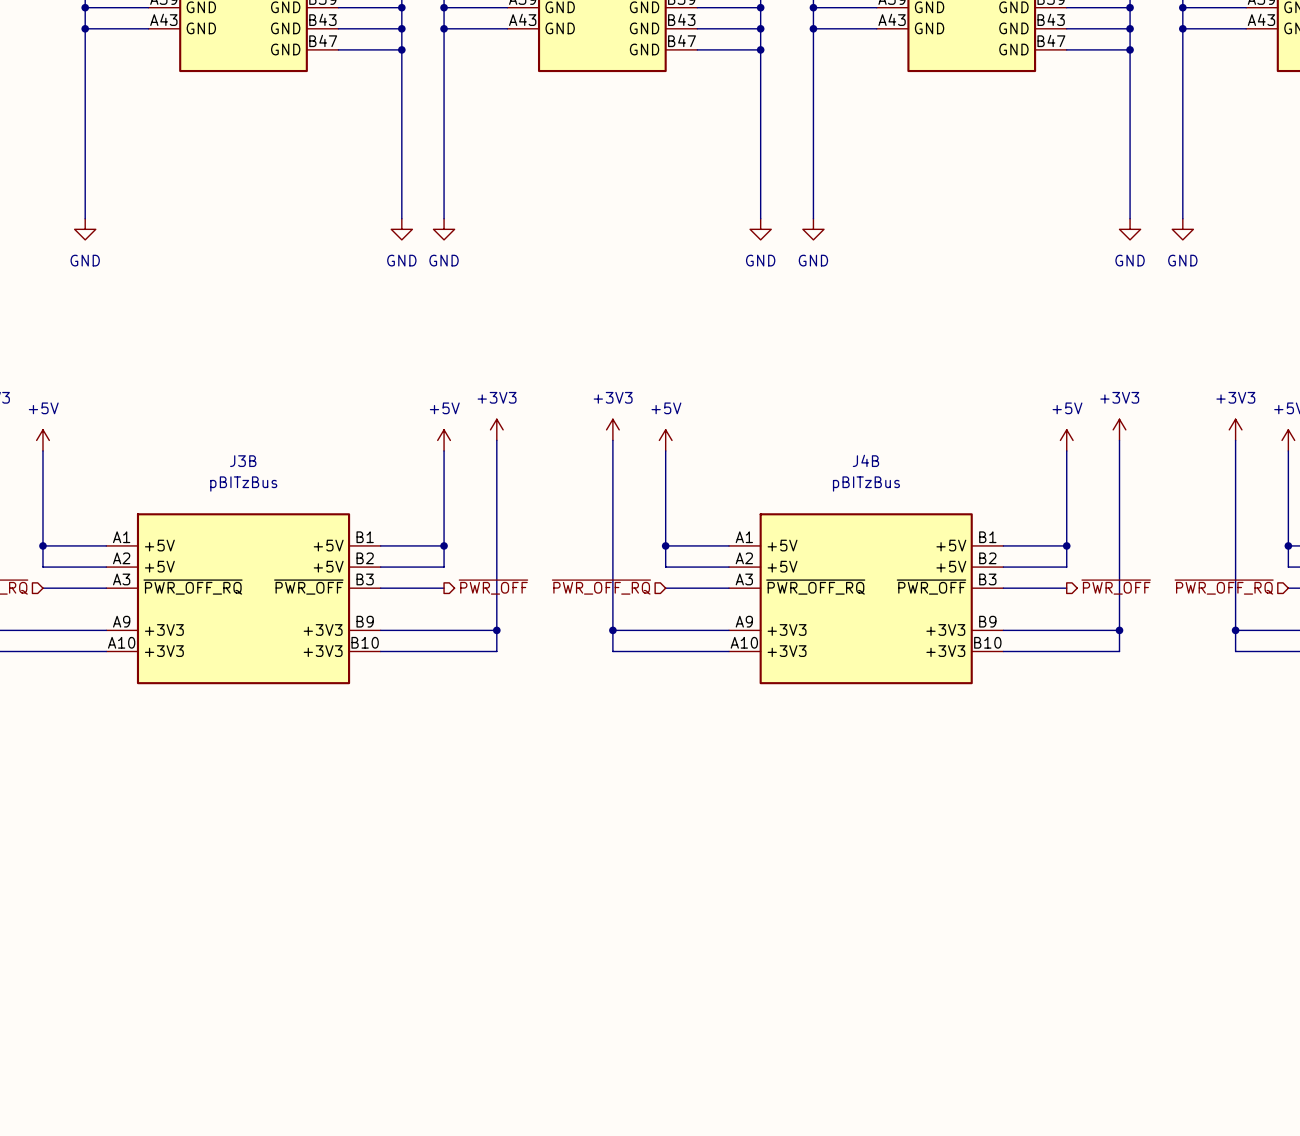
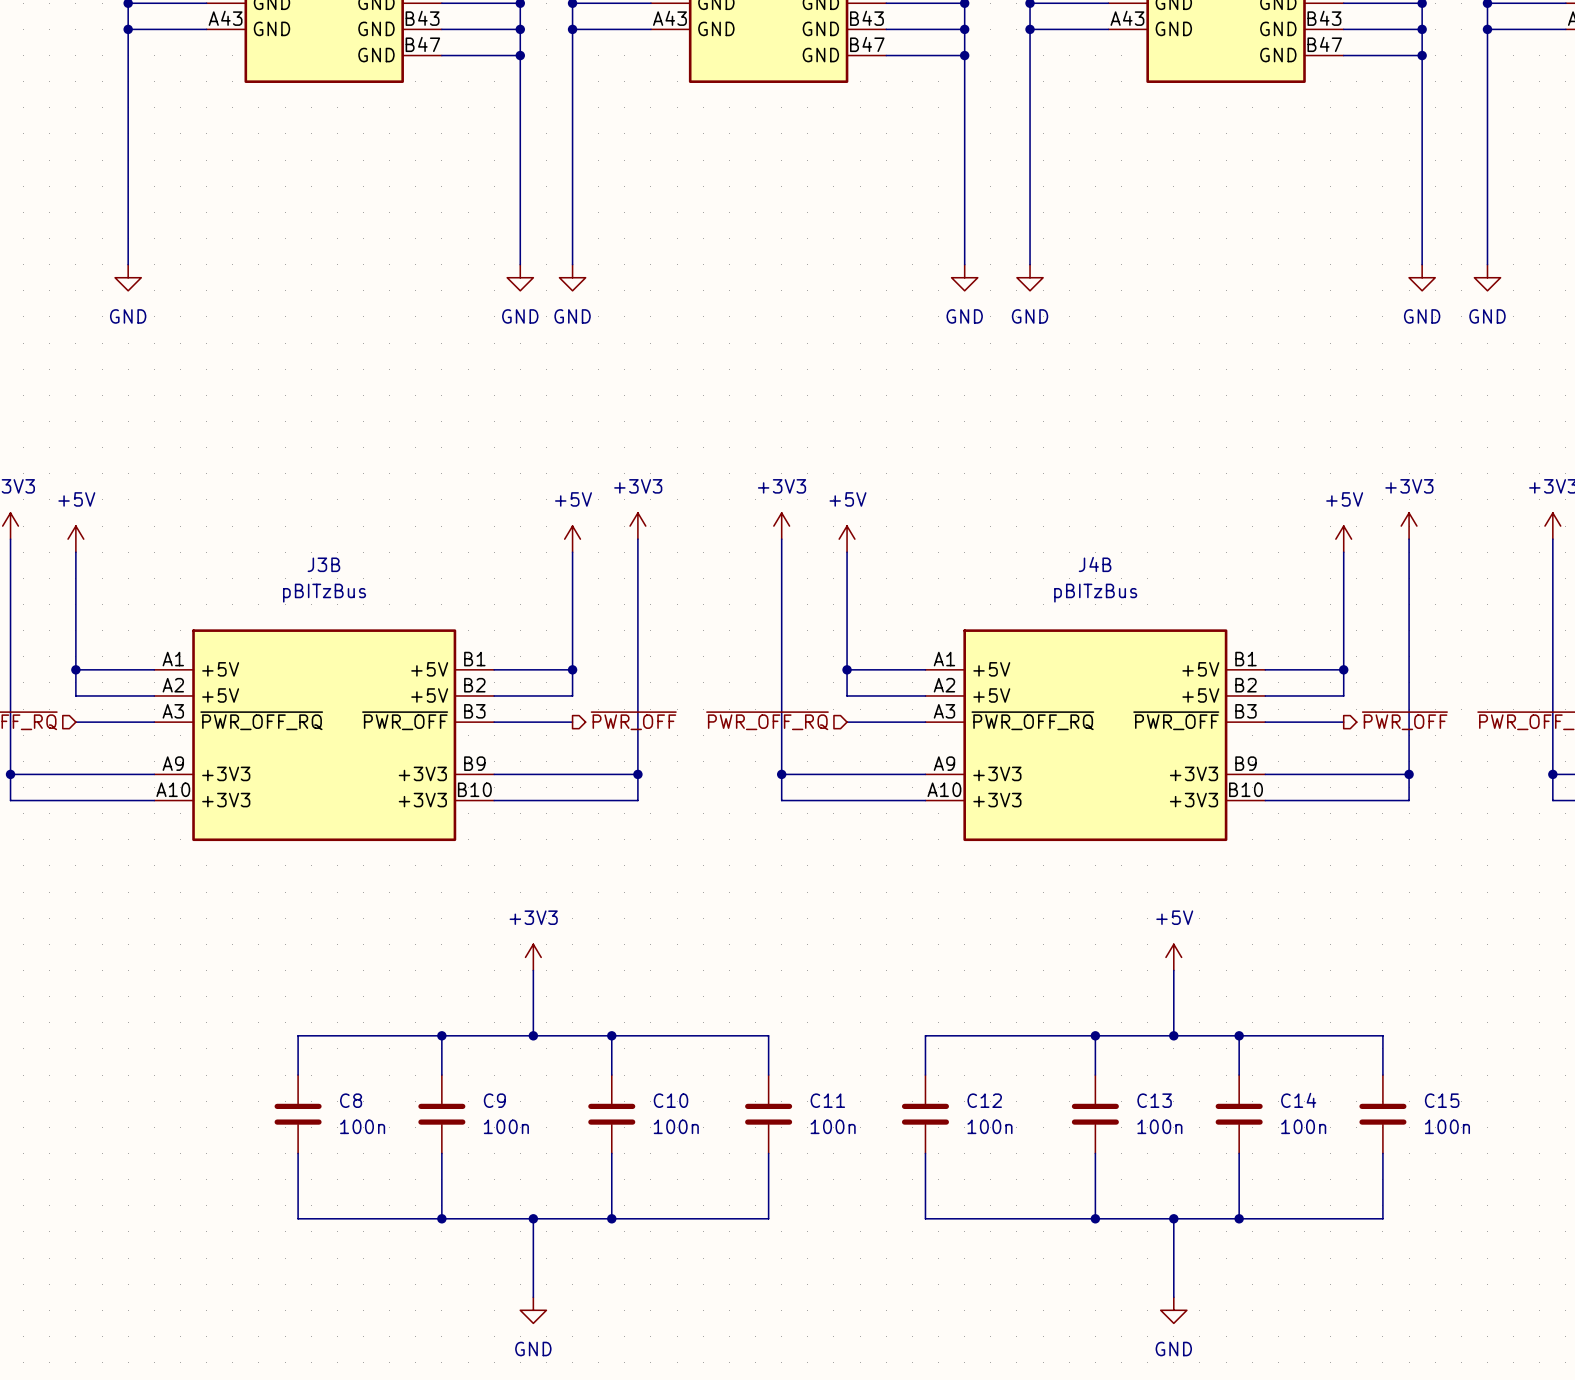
power symbol: none -> +3V3 (533, 957)
power symbol: none -> +5V (1173, 957)
wire: none -> (533, 970) (533, 1035)
wire: none -> (1173, 970) (1173, 1035)
wire: none -> (441, 1035) (441, 1075)
junction: none -> (441, 1035)
junction: none -> (533, 1035)
wire: none -> (611, 1035) (611, 1075)
junction: none -> (611, 1035)
wire: none -> (1095, 1035) (1095, 1075)
junction: none -> (1095, 1035)
junction: none -> (1173, 1035)
wire: none -> (1239, 1035) (1239, 1075)
junction: none -> (1239, 1035)
wire: none -> (298, 1075) (298, 1035) (768, 1035) (768, 1075)
wire: none -> (925, 1075) (925, 1035) (1382, 1035) (1382, 1075)
C8: none -> 100n (298, 1114)
C9: none -> 100n (441, 1114)
C10: none -> 100n (611, 1114)
C11: none -> 100n (768, 1114)
C12: none -> 100n (925, 1114)
C13: none -> 100n (1095, 1114)
C14: none -> 100n (1239, 1114)
C15: none -> 100n (1382, 1114)
wire: none -> (298, 1153) (298, 1218) (768, 1218) (768, 1153)
wire: none -> (441, 1153) (441, 1218)
wire: none -> (611, 1153) (611, 1218)
wire: none -> (925, 1153) (925, 1218) (1382, 1218) (1382, 1153)
wire: none -> (1095, 1153) (1095, 1218)
wire: none -> (1239, 1153) (1239, 1218)
junction: none -> (441, 1218)
wire: none -> (533, 1218) (533, 1297)
junction: none -> (533, 1218)
junction: none -> (611, 1218)
junction: none -> (1095, 1218)
wire: none -> (1173, 1218) (1173, 1297)
junction: none -> (1173, 1218)
junction: none -> (1239, 1218)
power symbol: none -> GND (533, 1310)
power symbol: none -> GND (1173, 1310)

